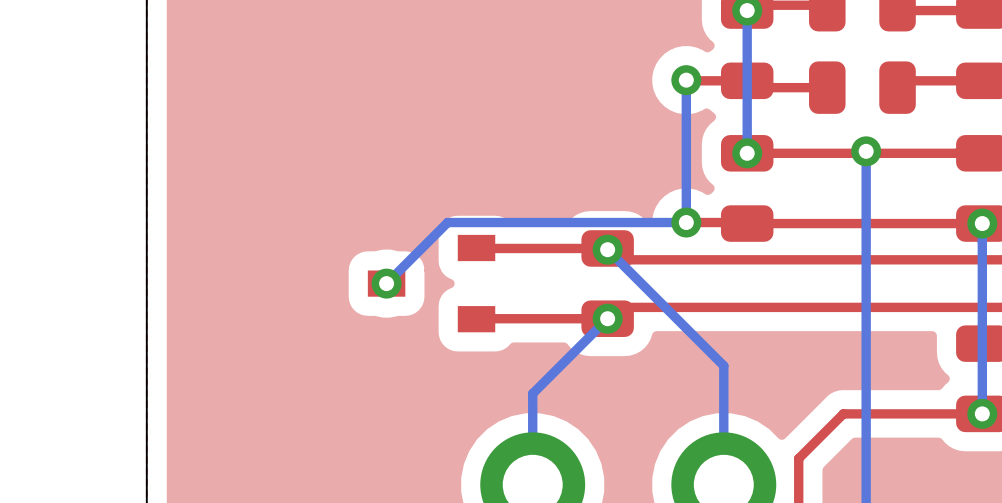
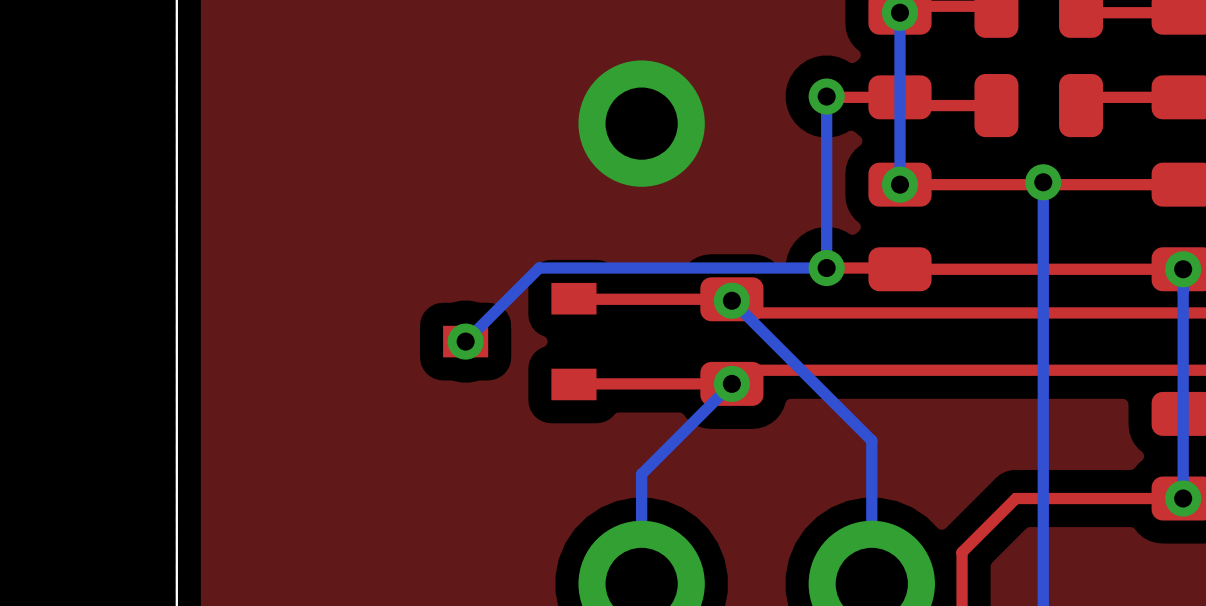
part: none -> (641, 123)

